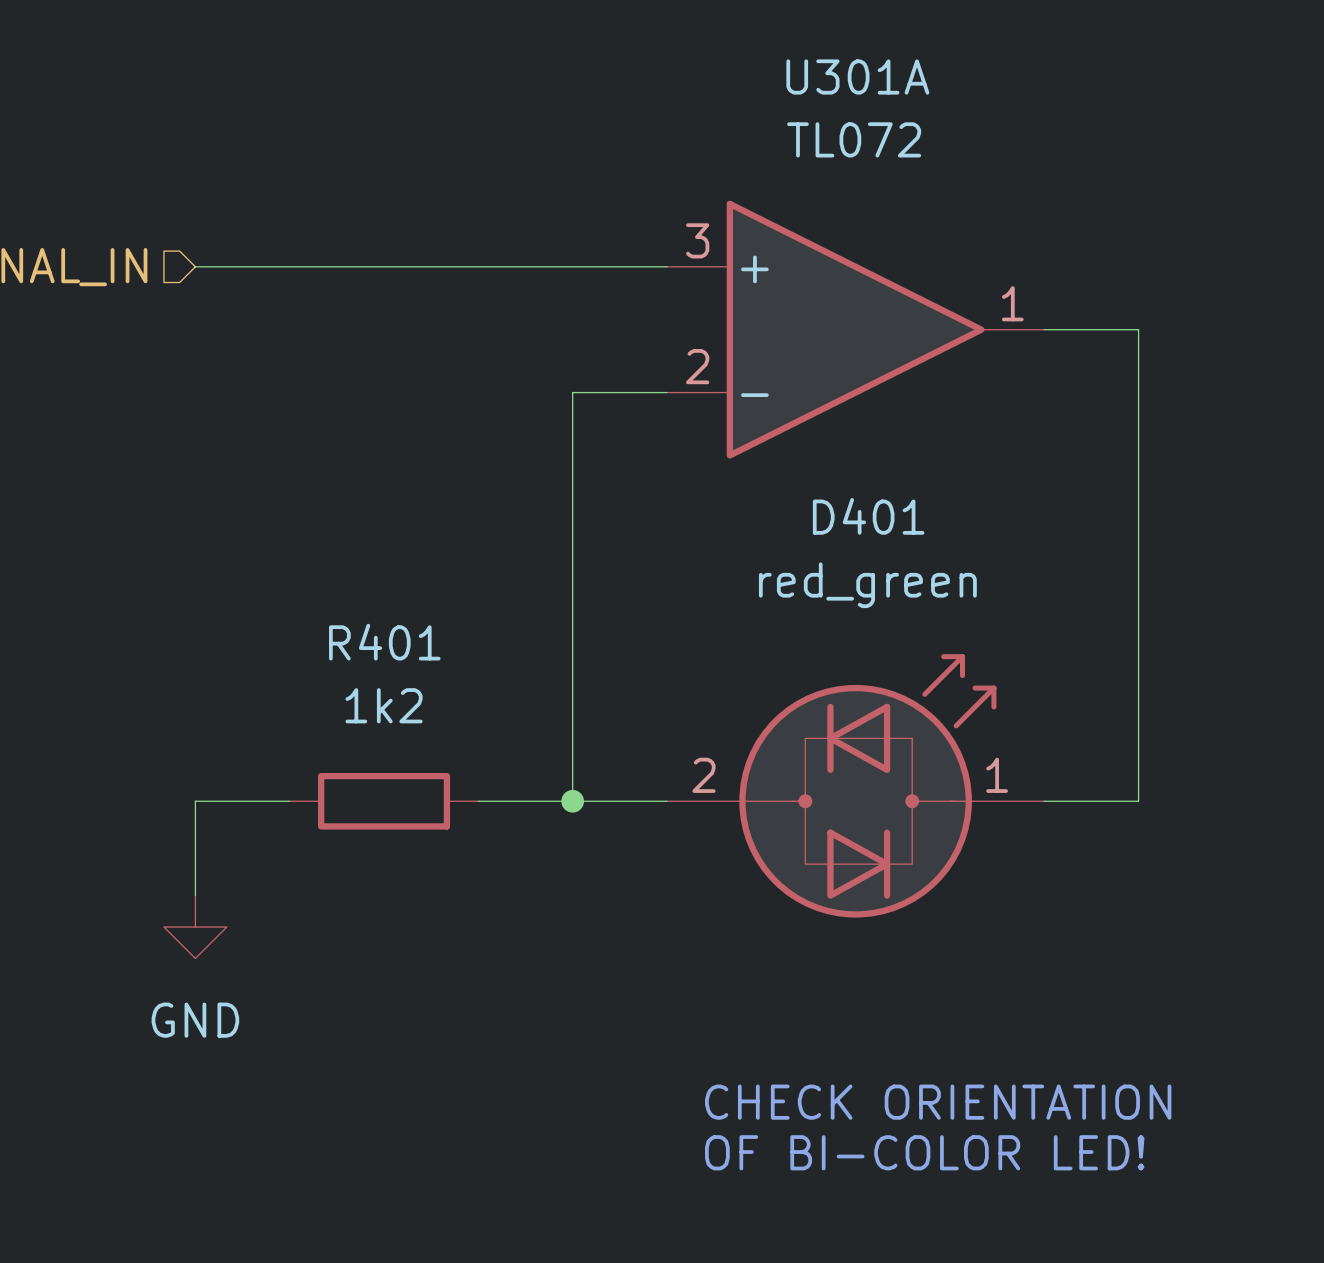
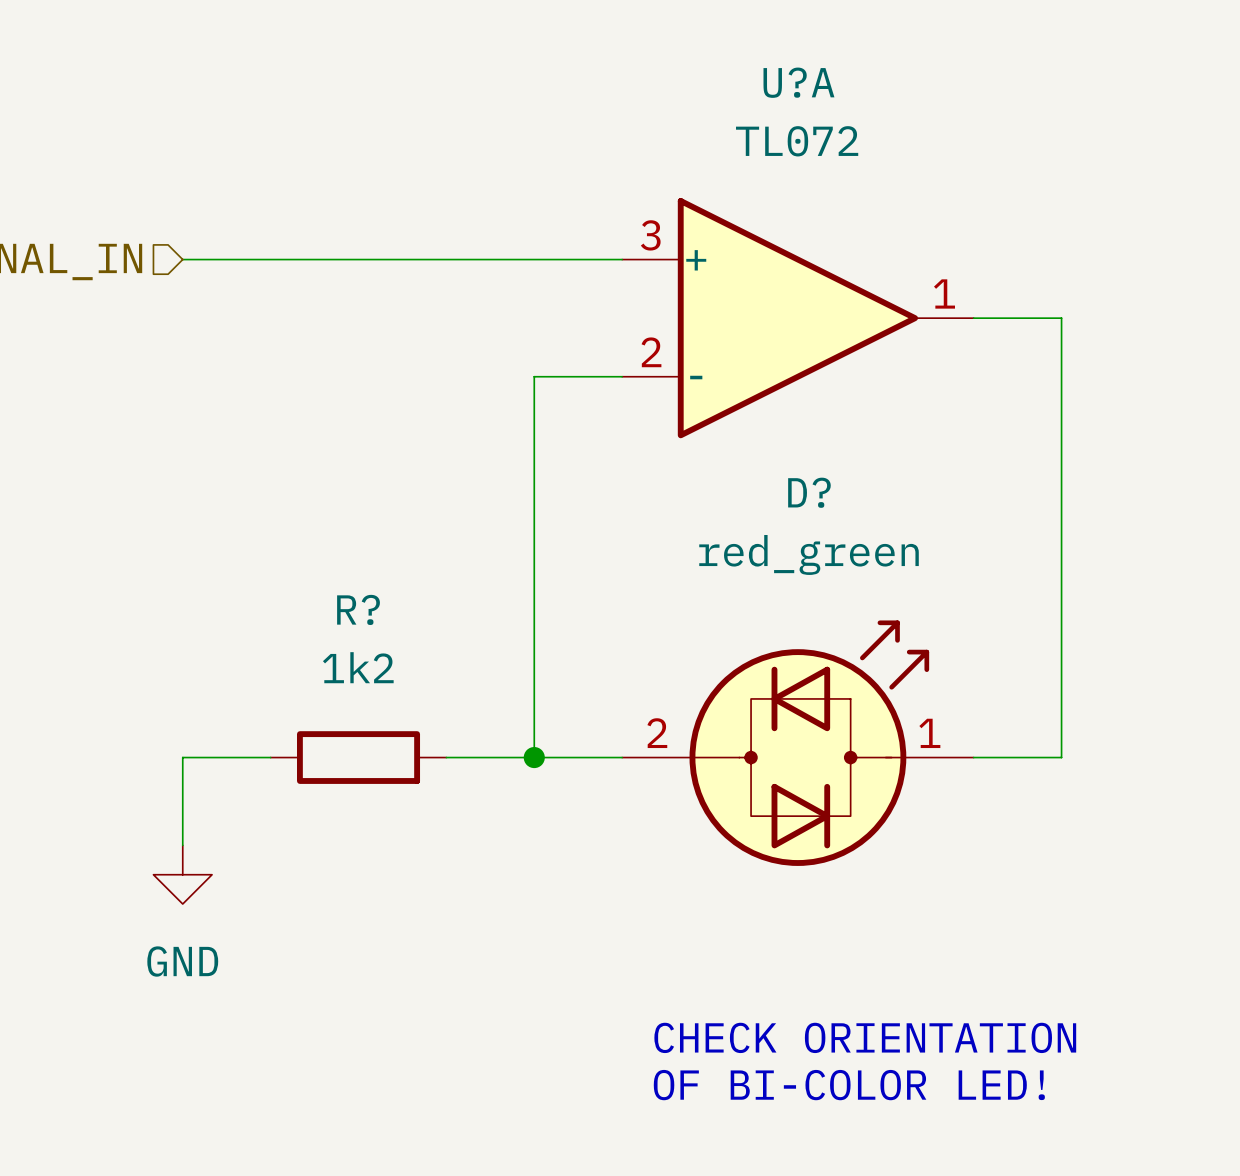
U301A name: U301A (857, 77) -> U?A (798, 82)
D401 name: D401 (868, 516) -> D? (809, 492)
R401 name: R401 (384, 642) -> R? (358, 609)

